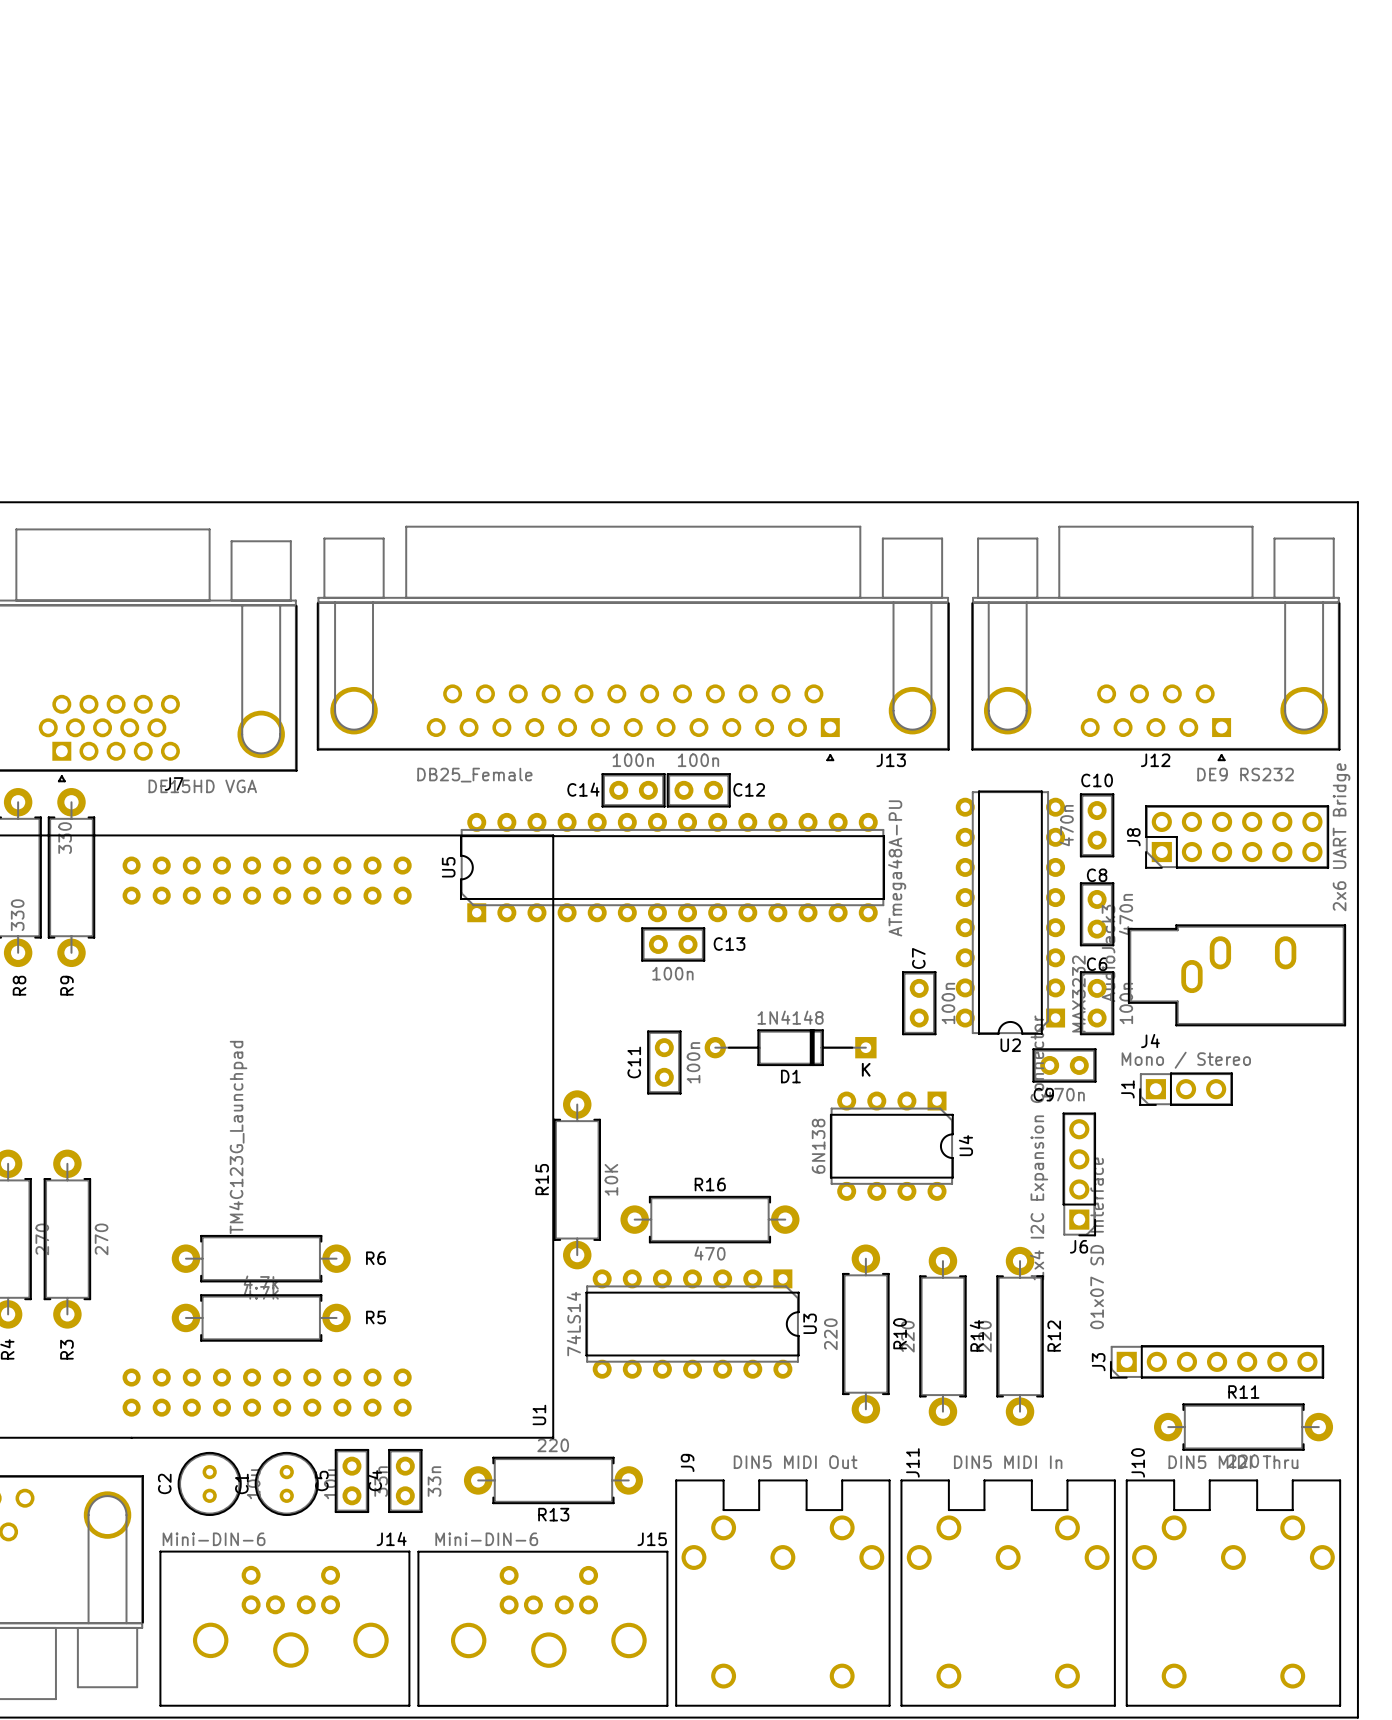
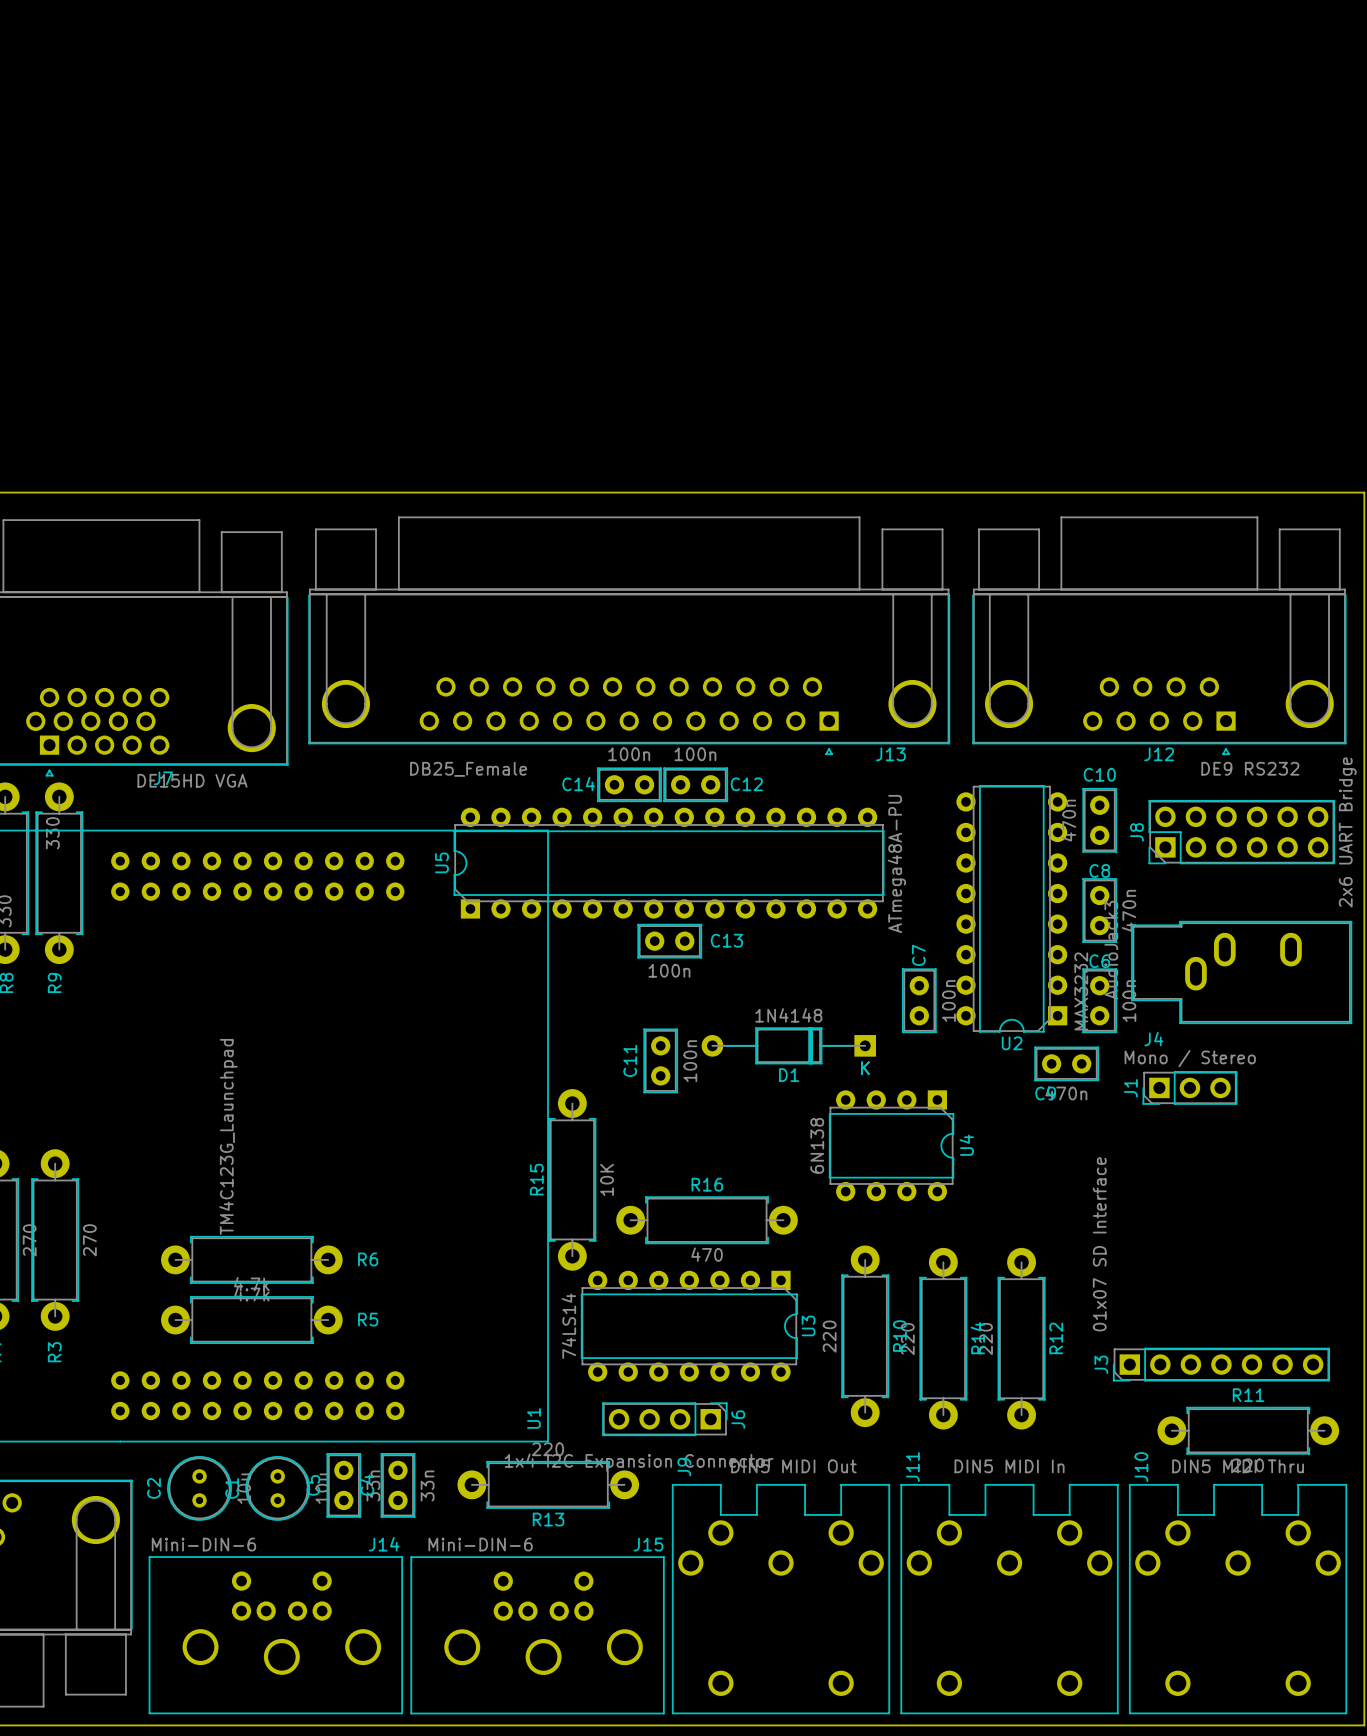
J6 rotation: 0° (1079, 1174) -> 90° counterclockwise (664, 1419)
J6 position: (1079, 1174) -> (664, 1419)

